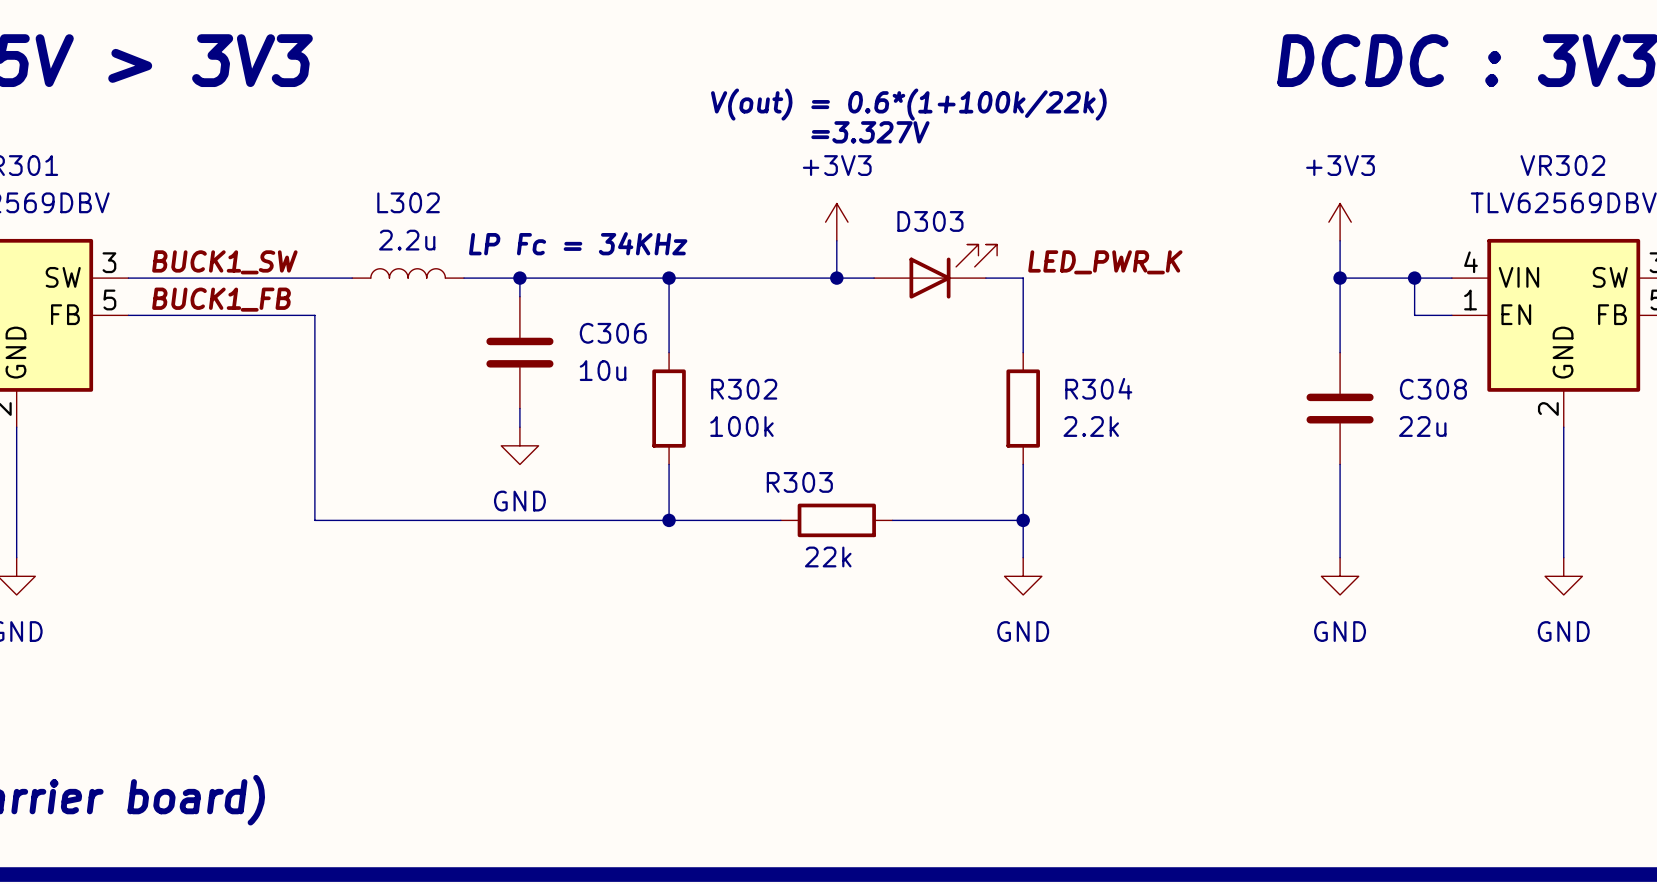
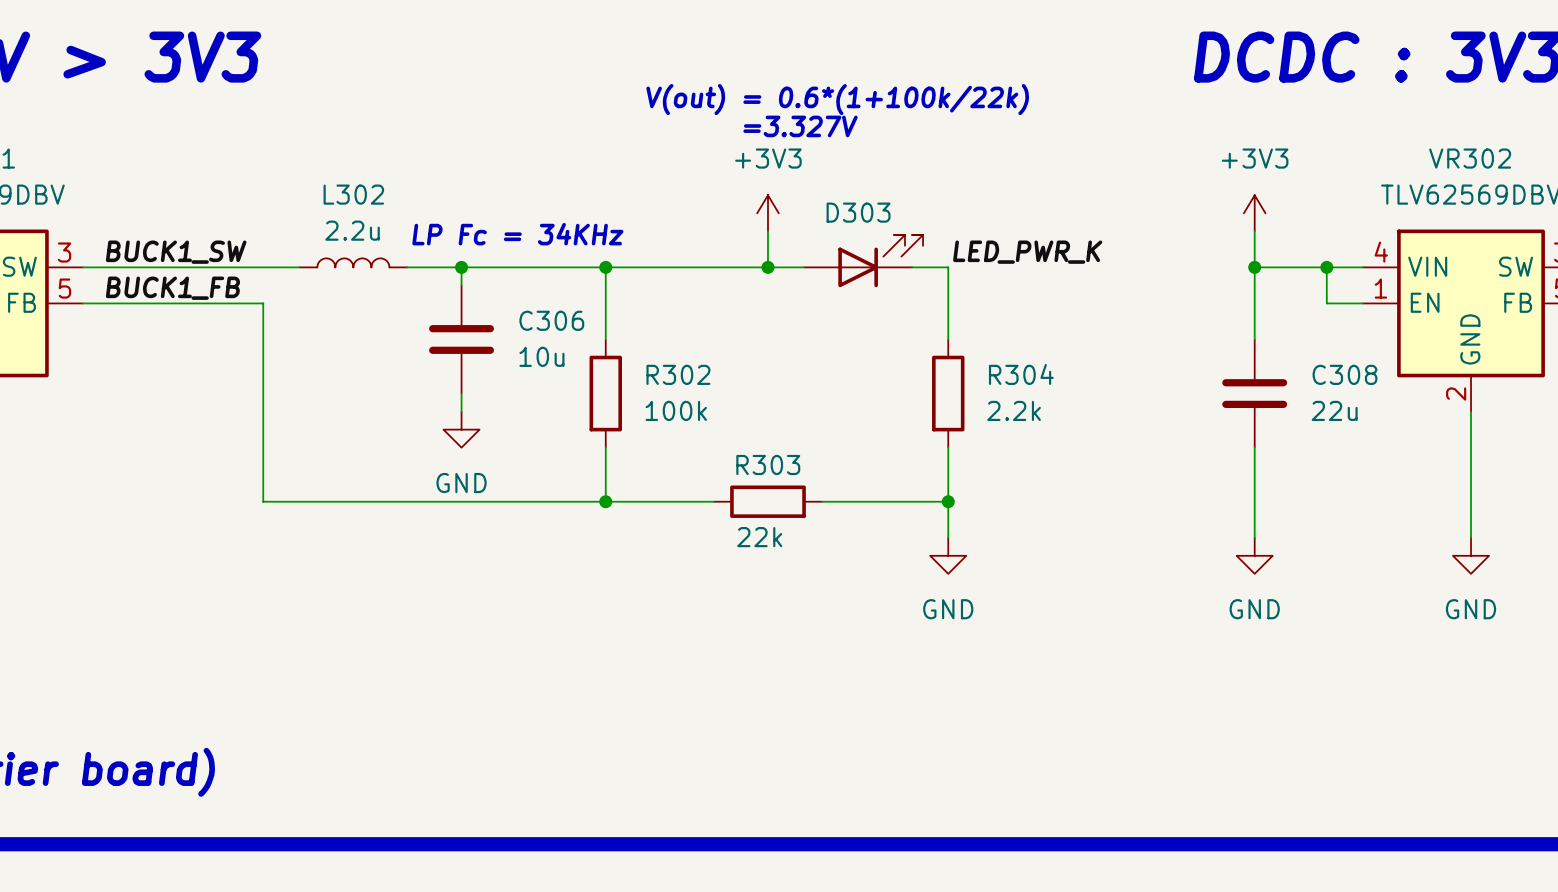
R303 name position: R303 (799, 482) -> R303 (768, 465)

